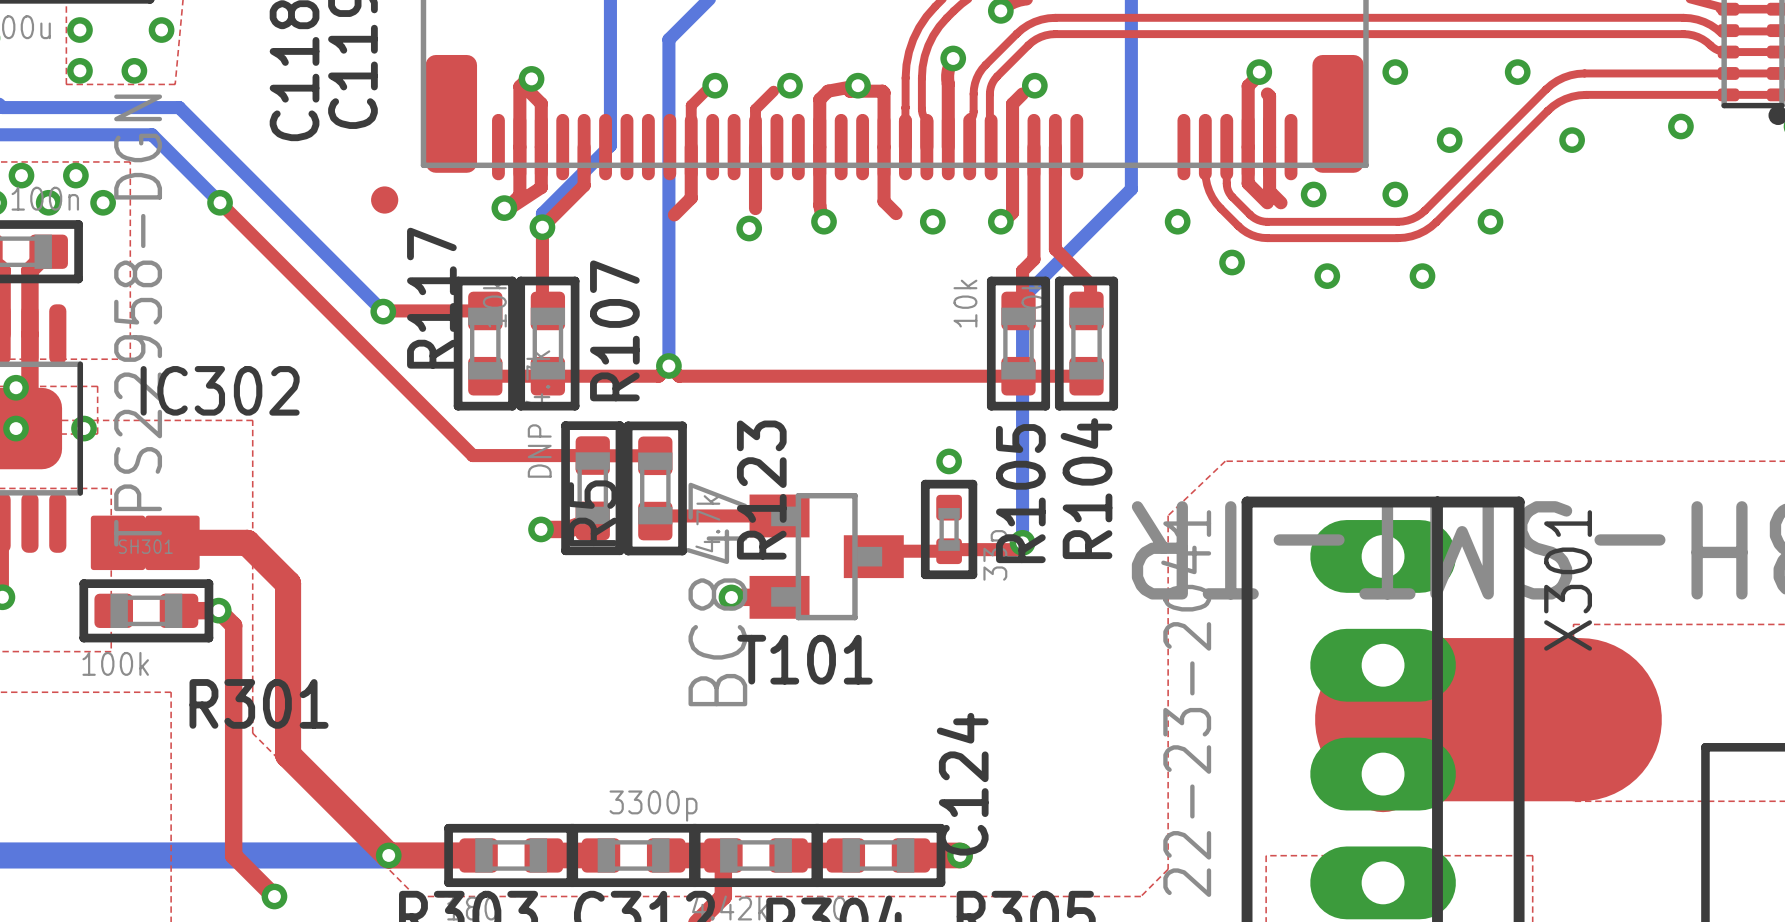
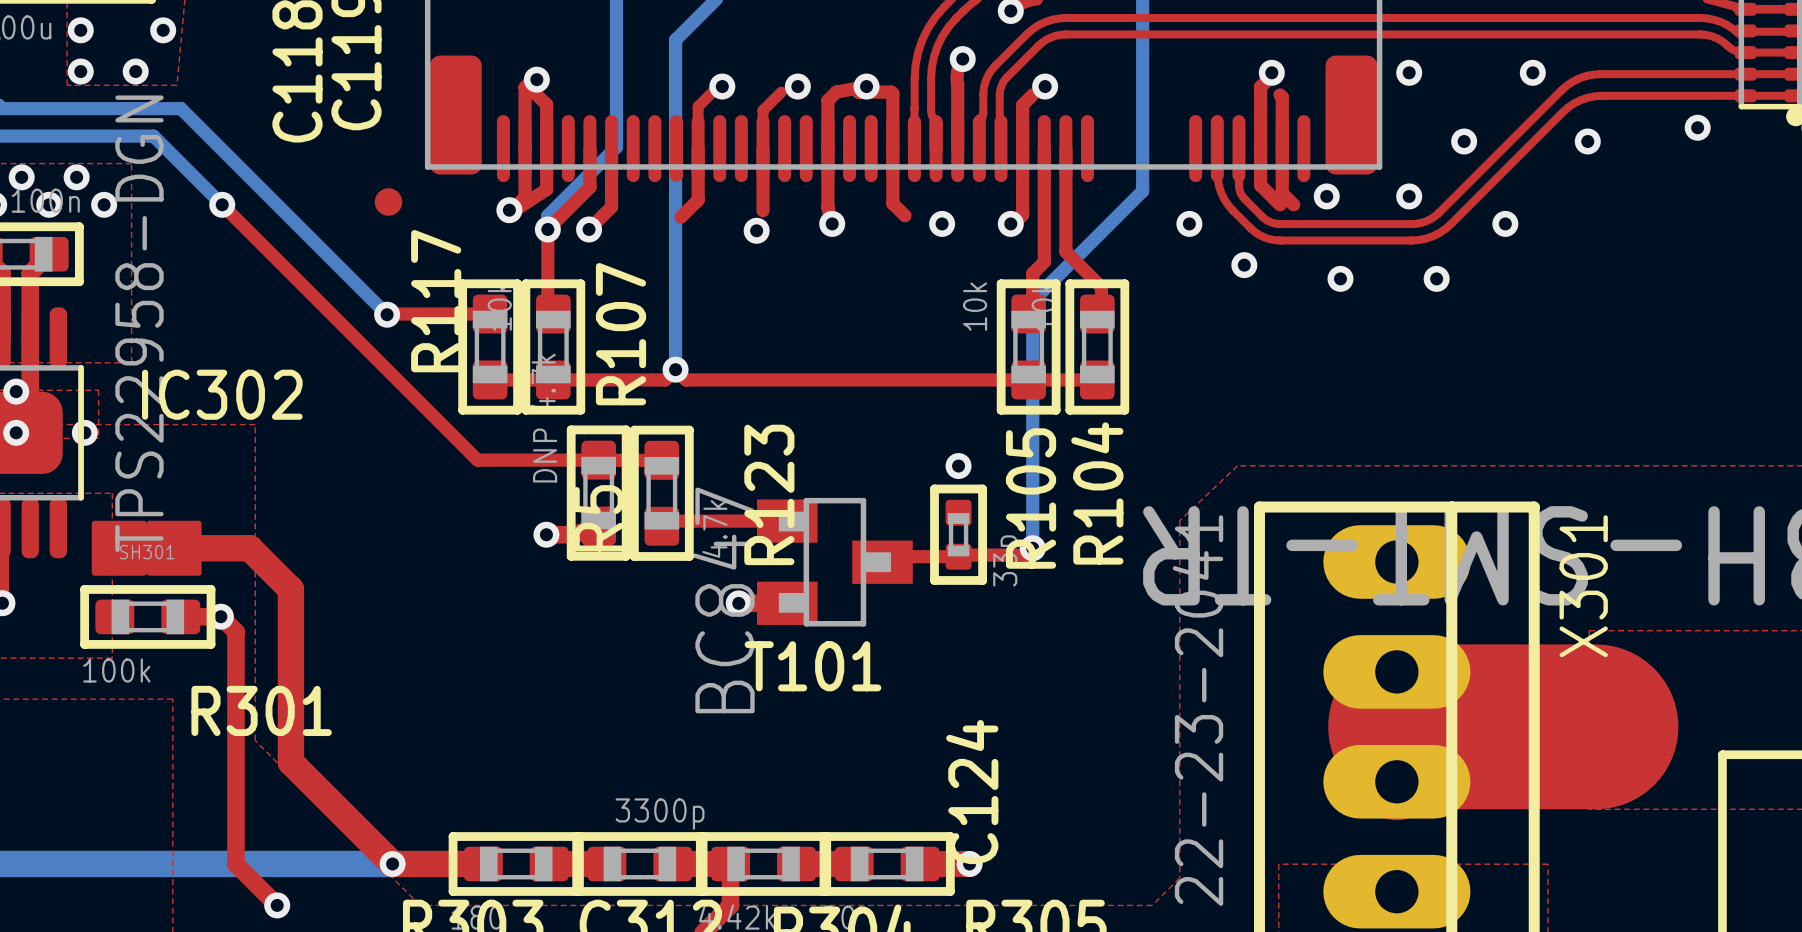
top track: none -> (611, 148) (611, 206) (589, 229)
via: none -> (589, 229)

